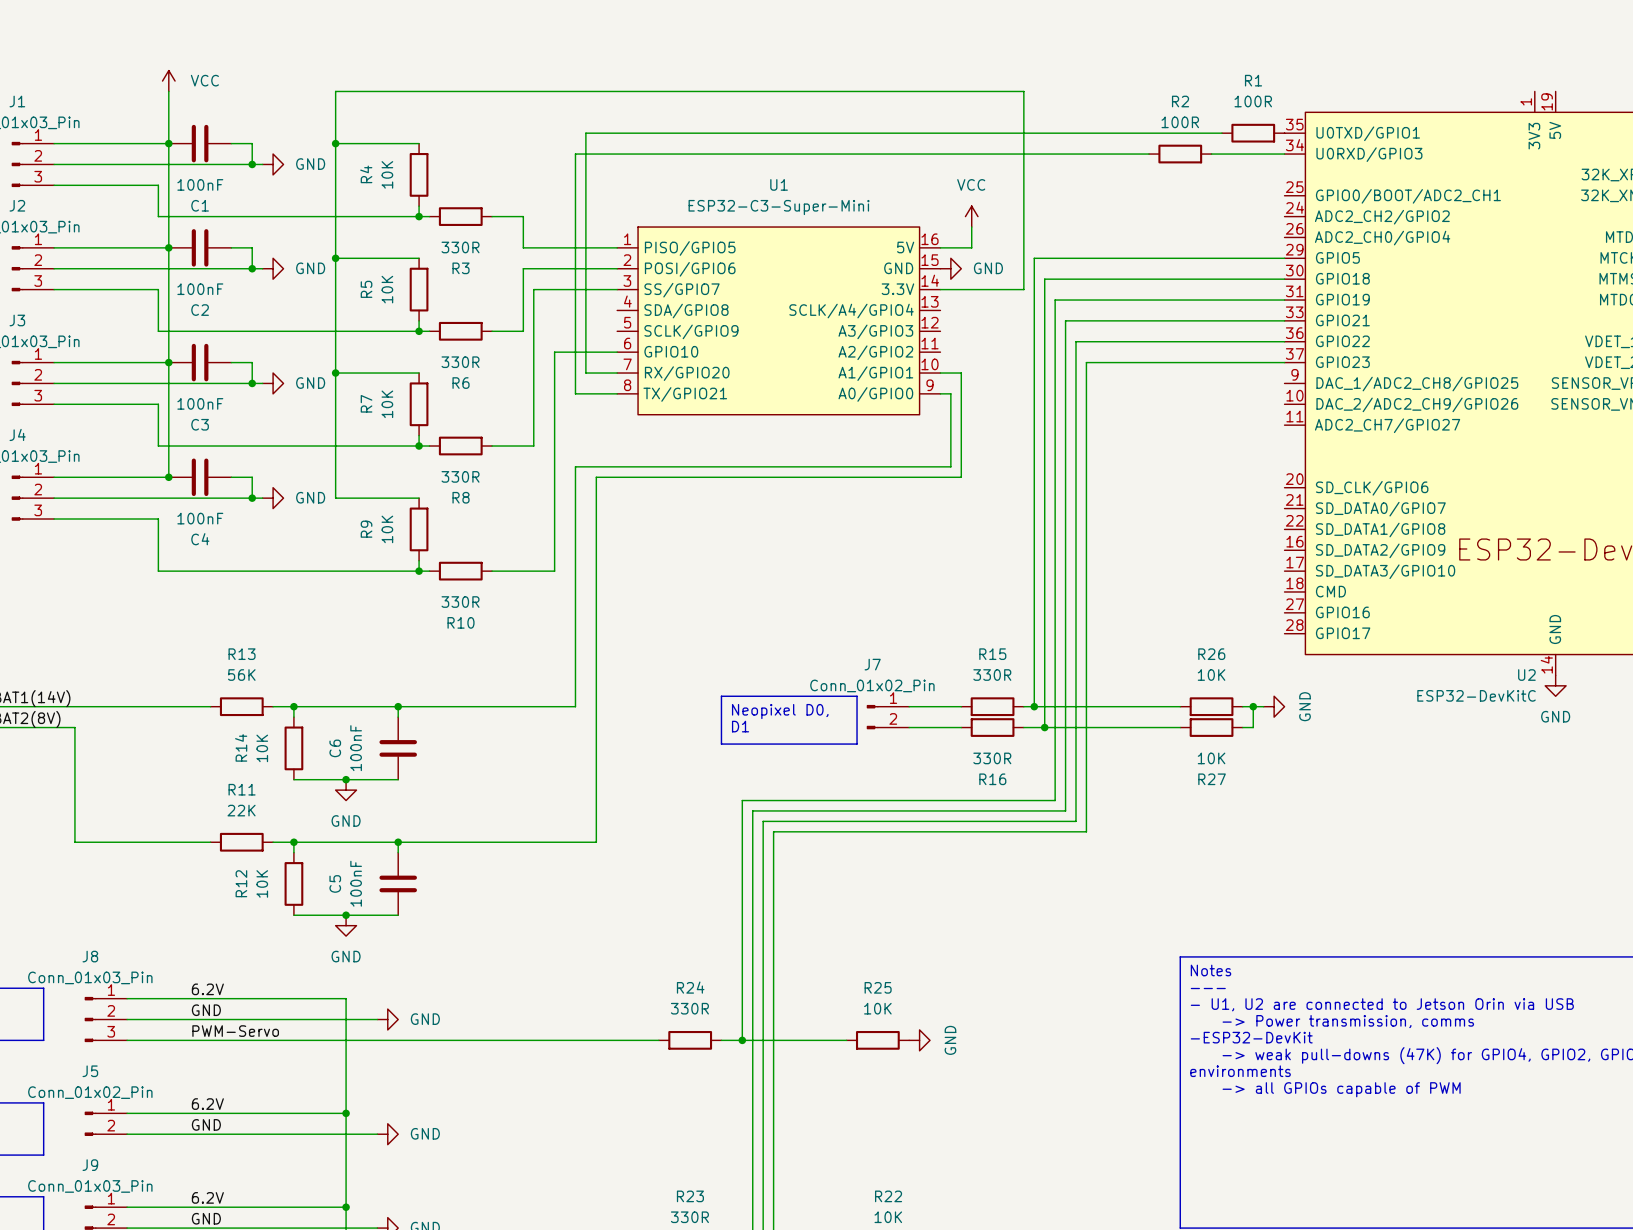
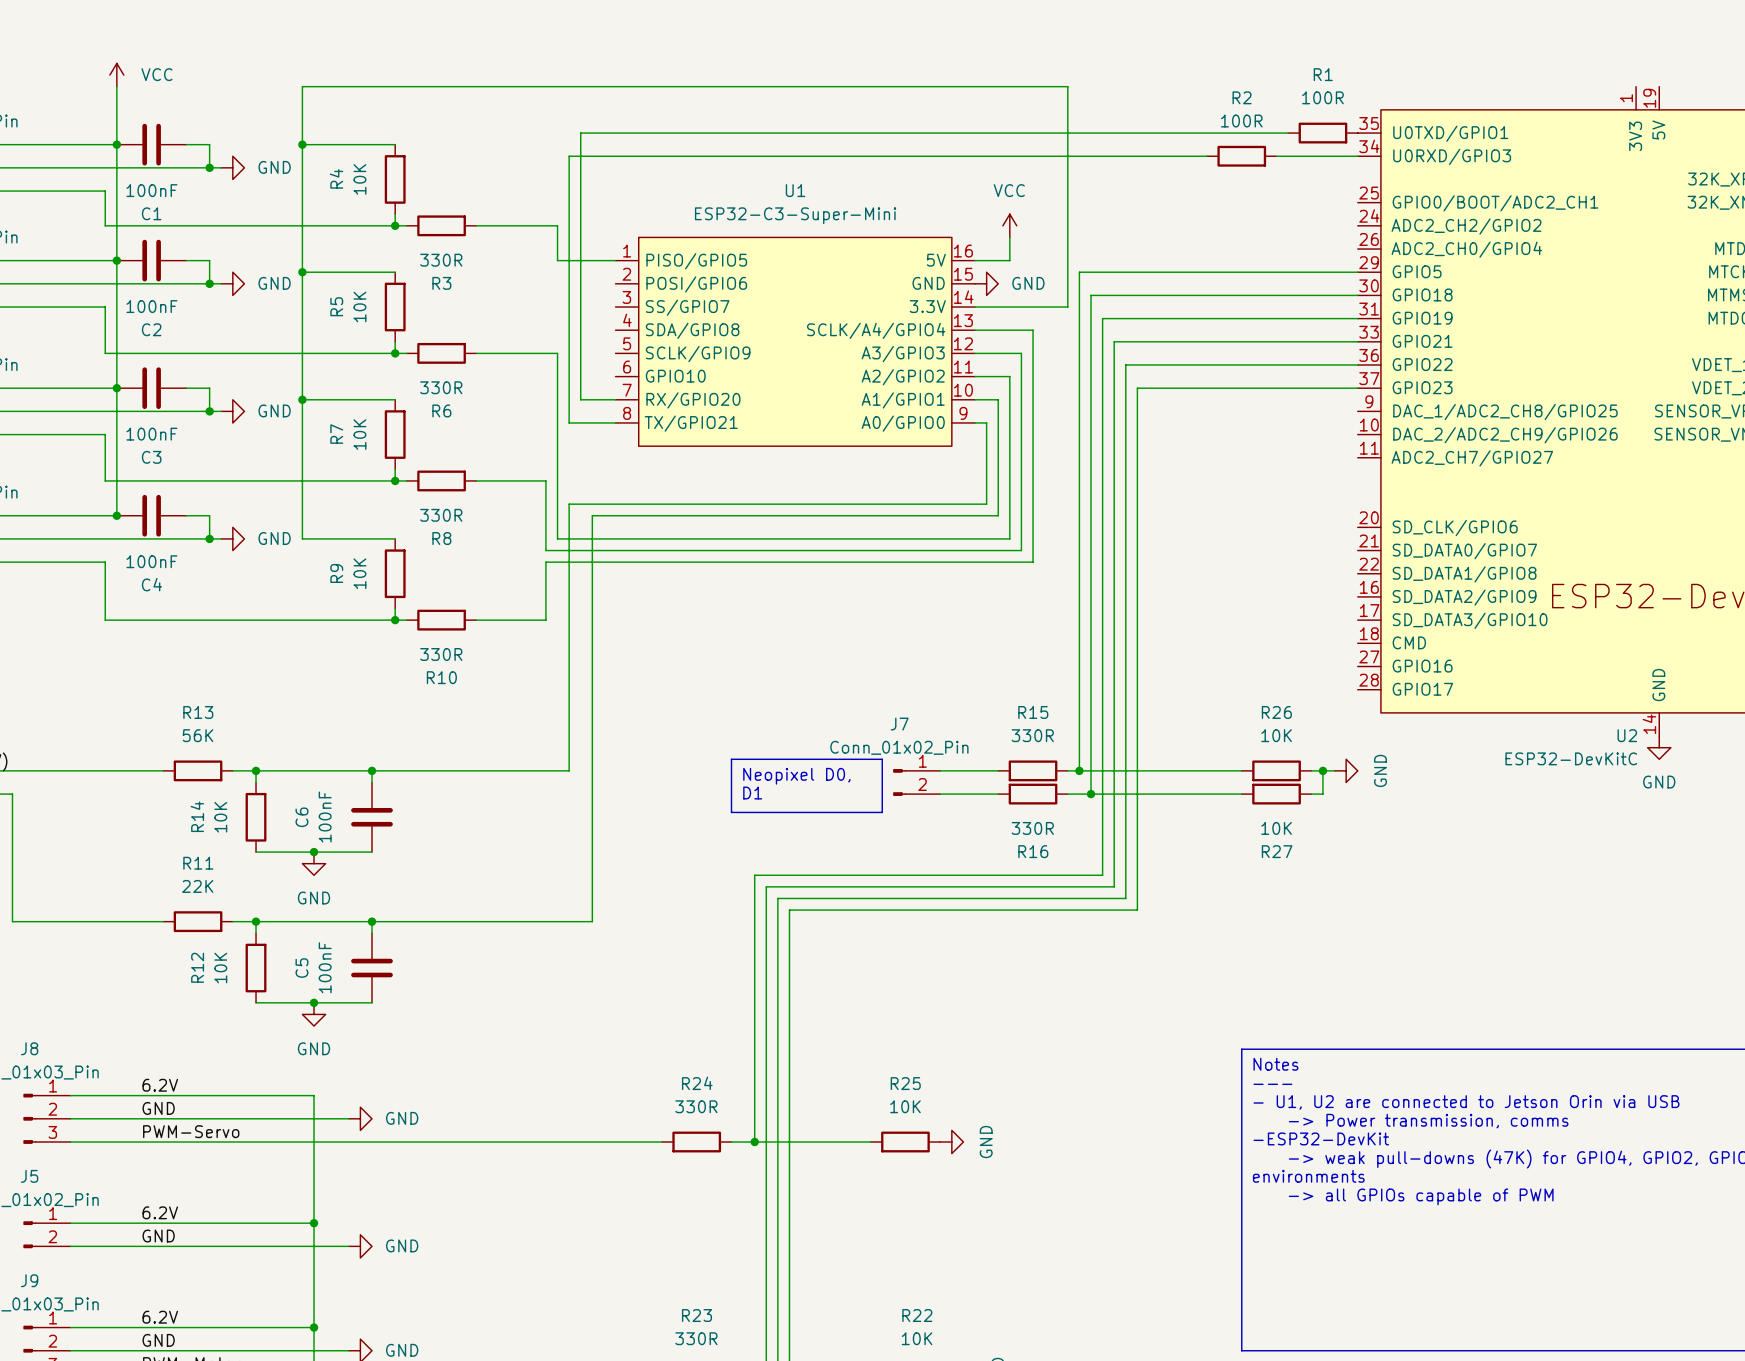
wire: (523, 216) (523, 247) (565, 247) -> (511, 225) (557, 225) (557, 260)
wire: (617, 268) (523, 268) (523, 331) -> (975, 376) (1009, 376) (1009, 538) (557, 538) (557, 353) (511, 353)
wire: (617, 289) (533, 289) (533, 446) -> none
wire: none -> (975, 330) (1033, 330) (1033, 562) (545, 562)
wire: (617, 352) (554, 352) (554, 446) -> (522, 480) (545, 480)
wire: (554, 508) (554, 518) -> (545, 550) (1021, 550) (1021, 353) (975, 353)

